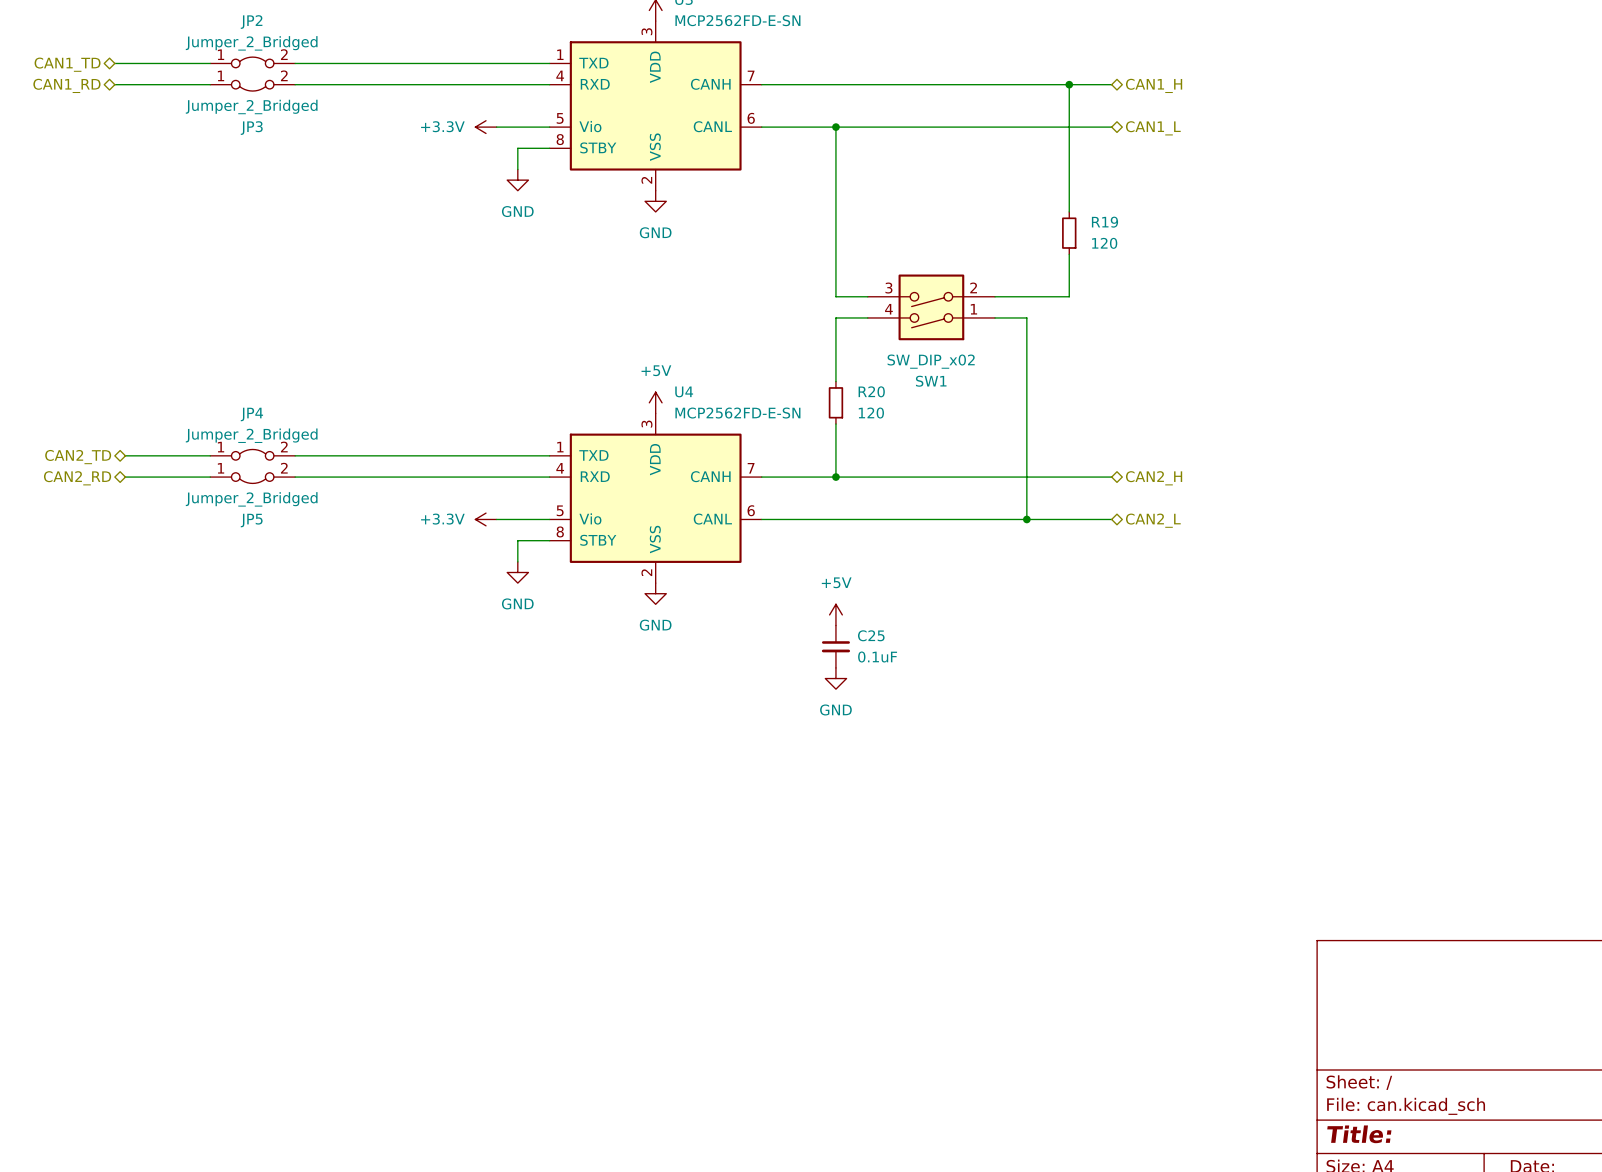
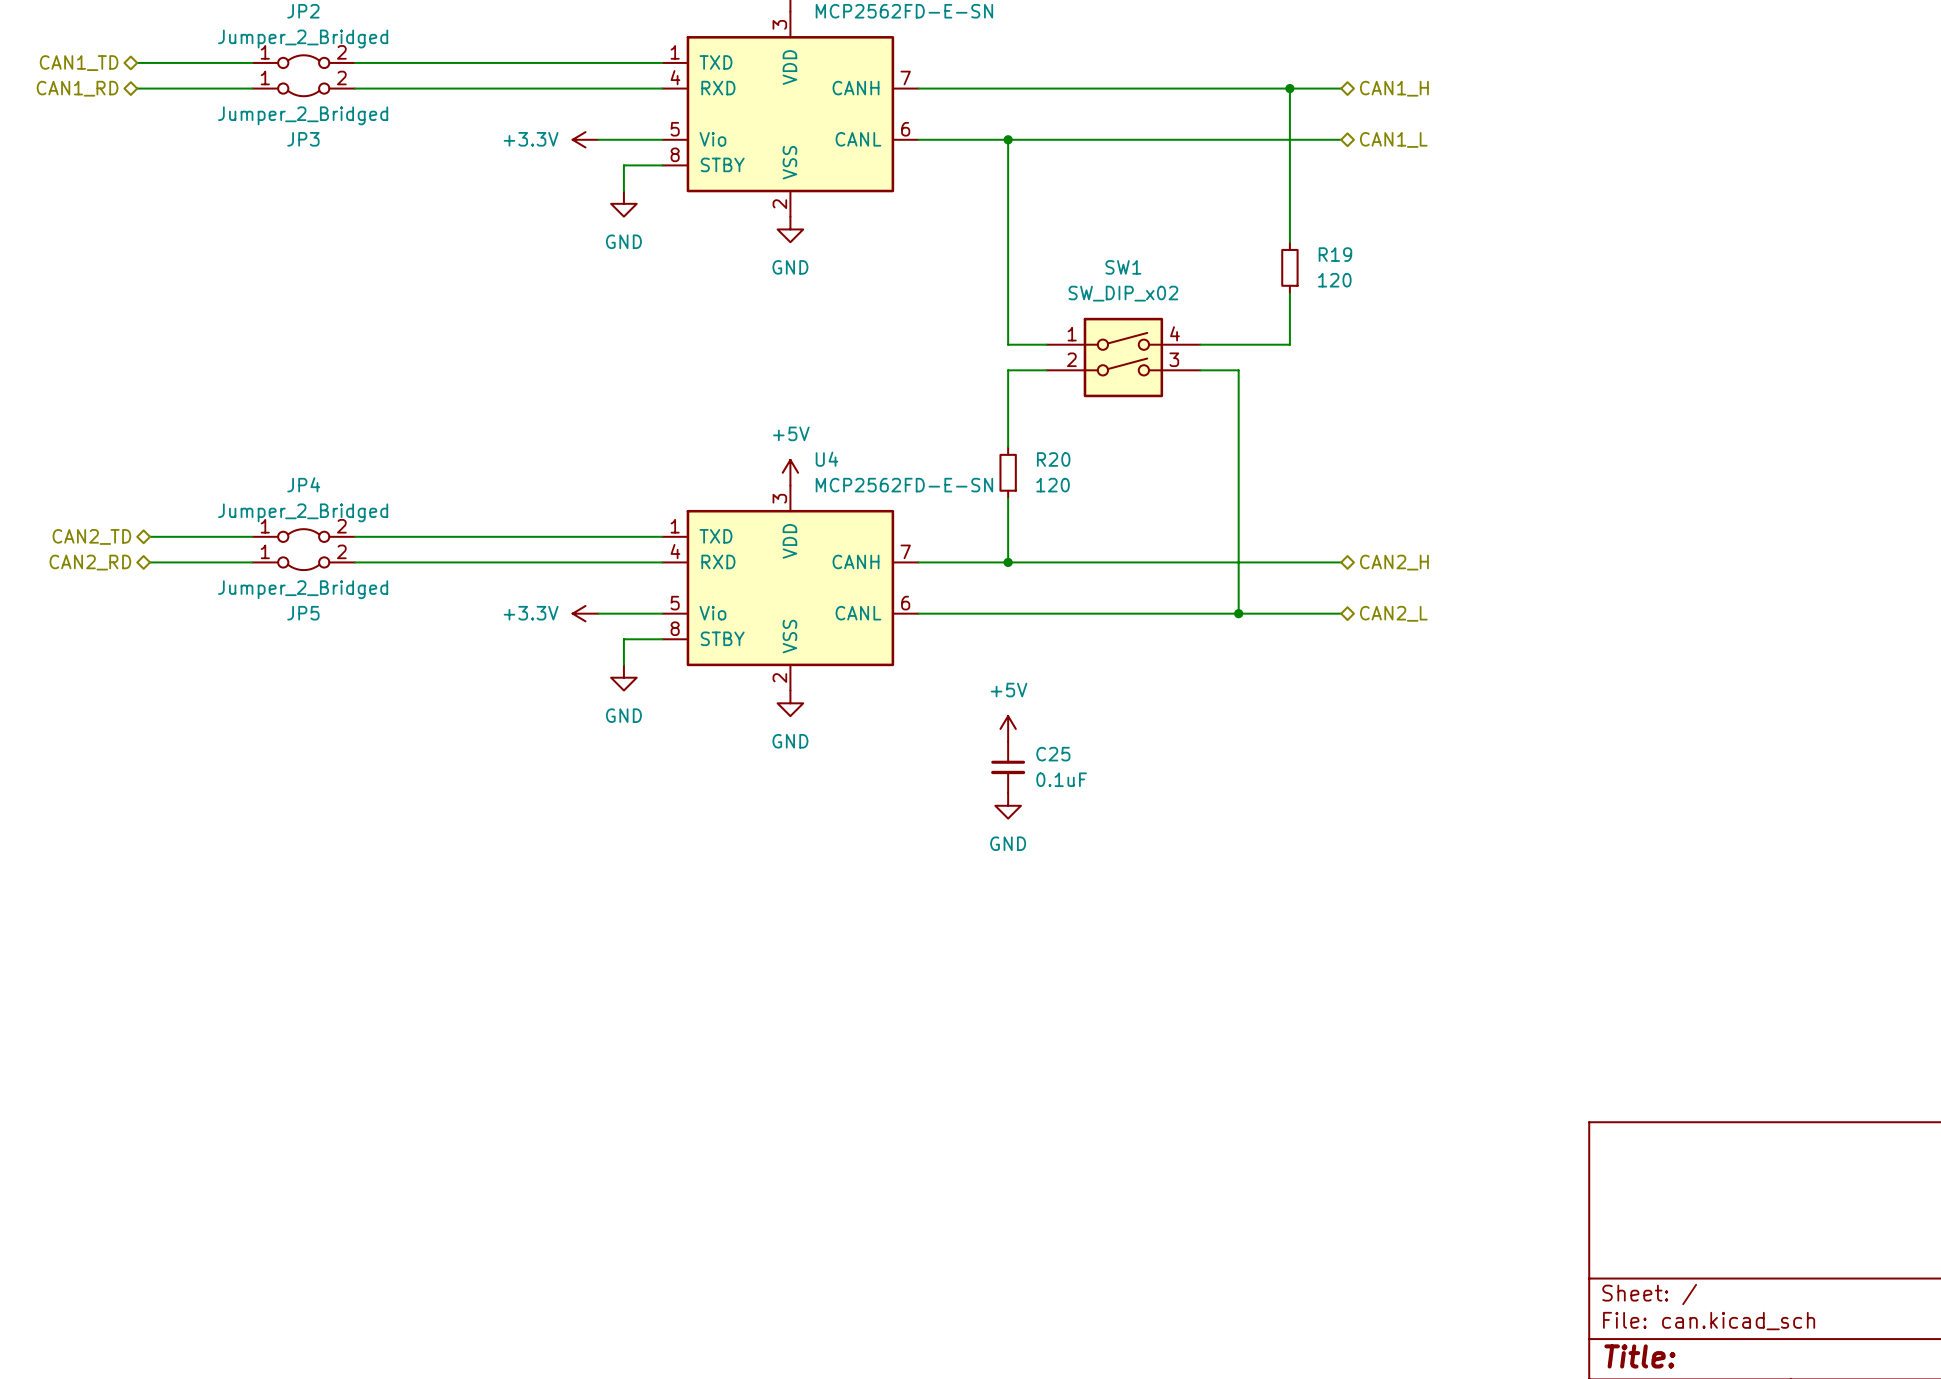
SW1 rotation: 0° (931, 307) -> 180° (1123, 357)

